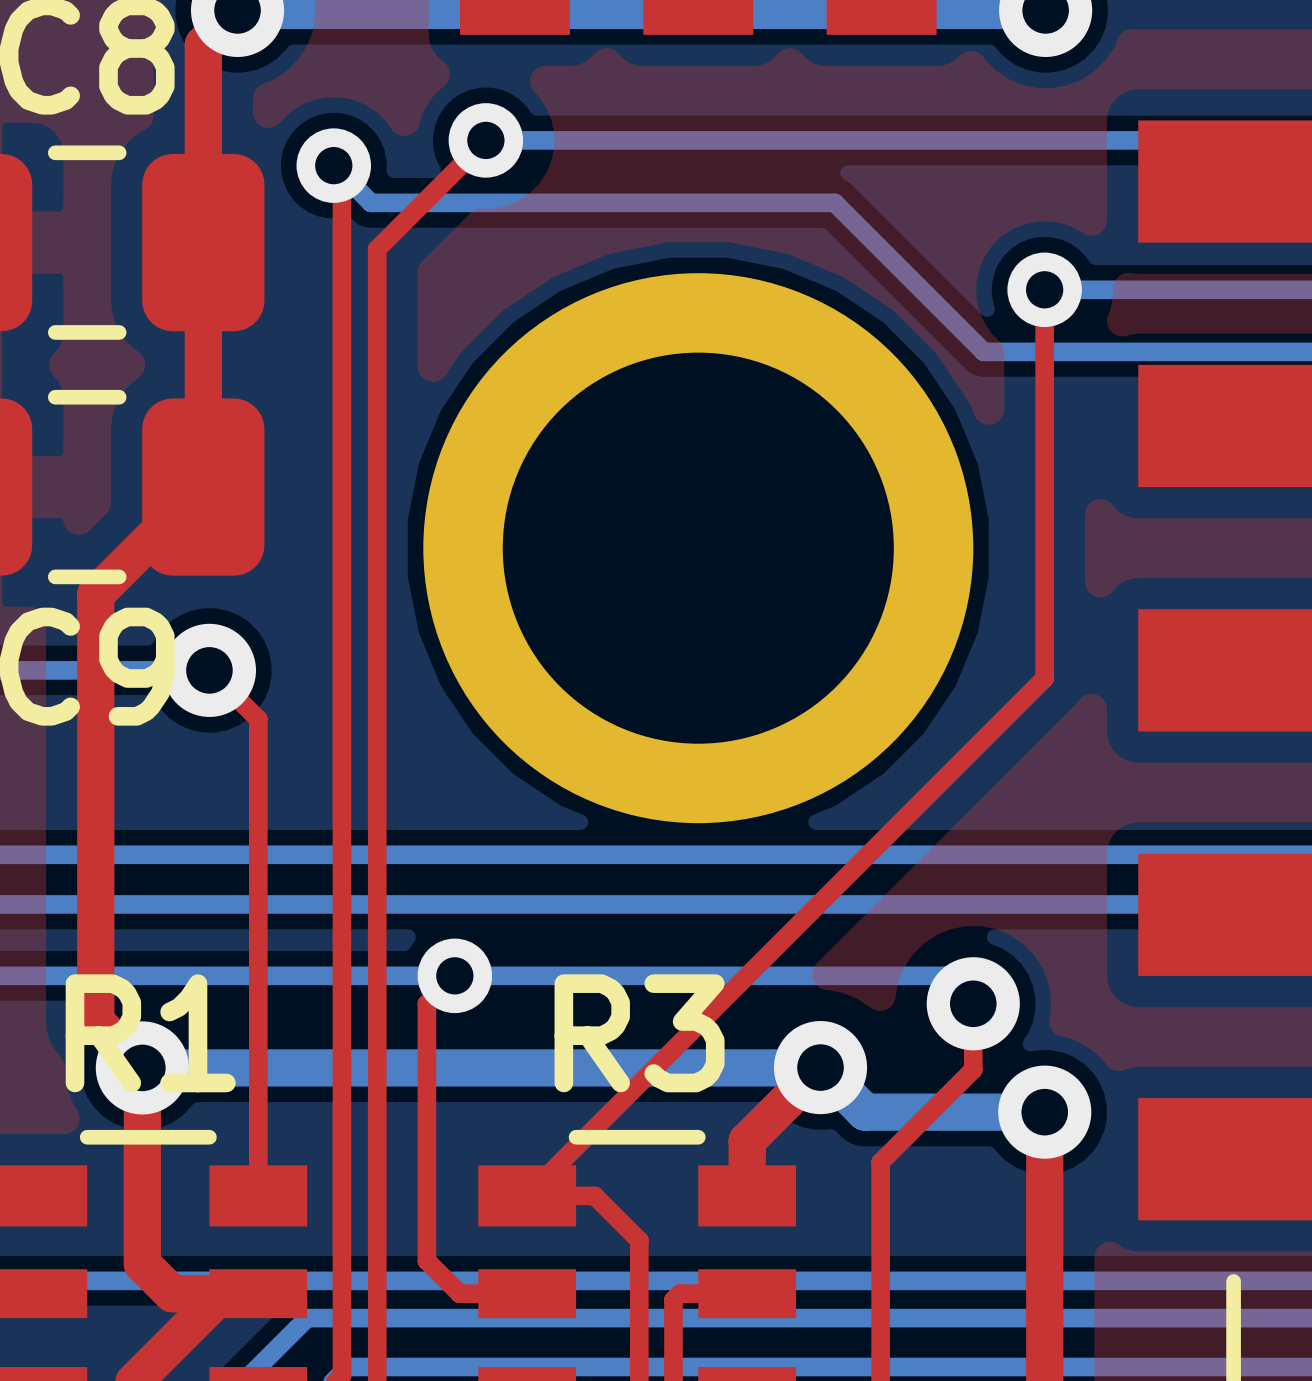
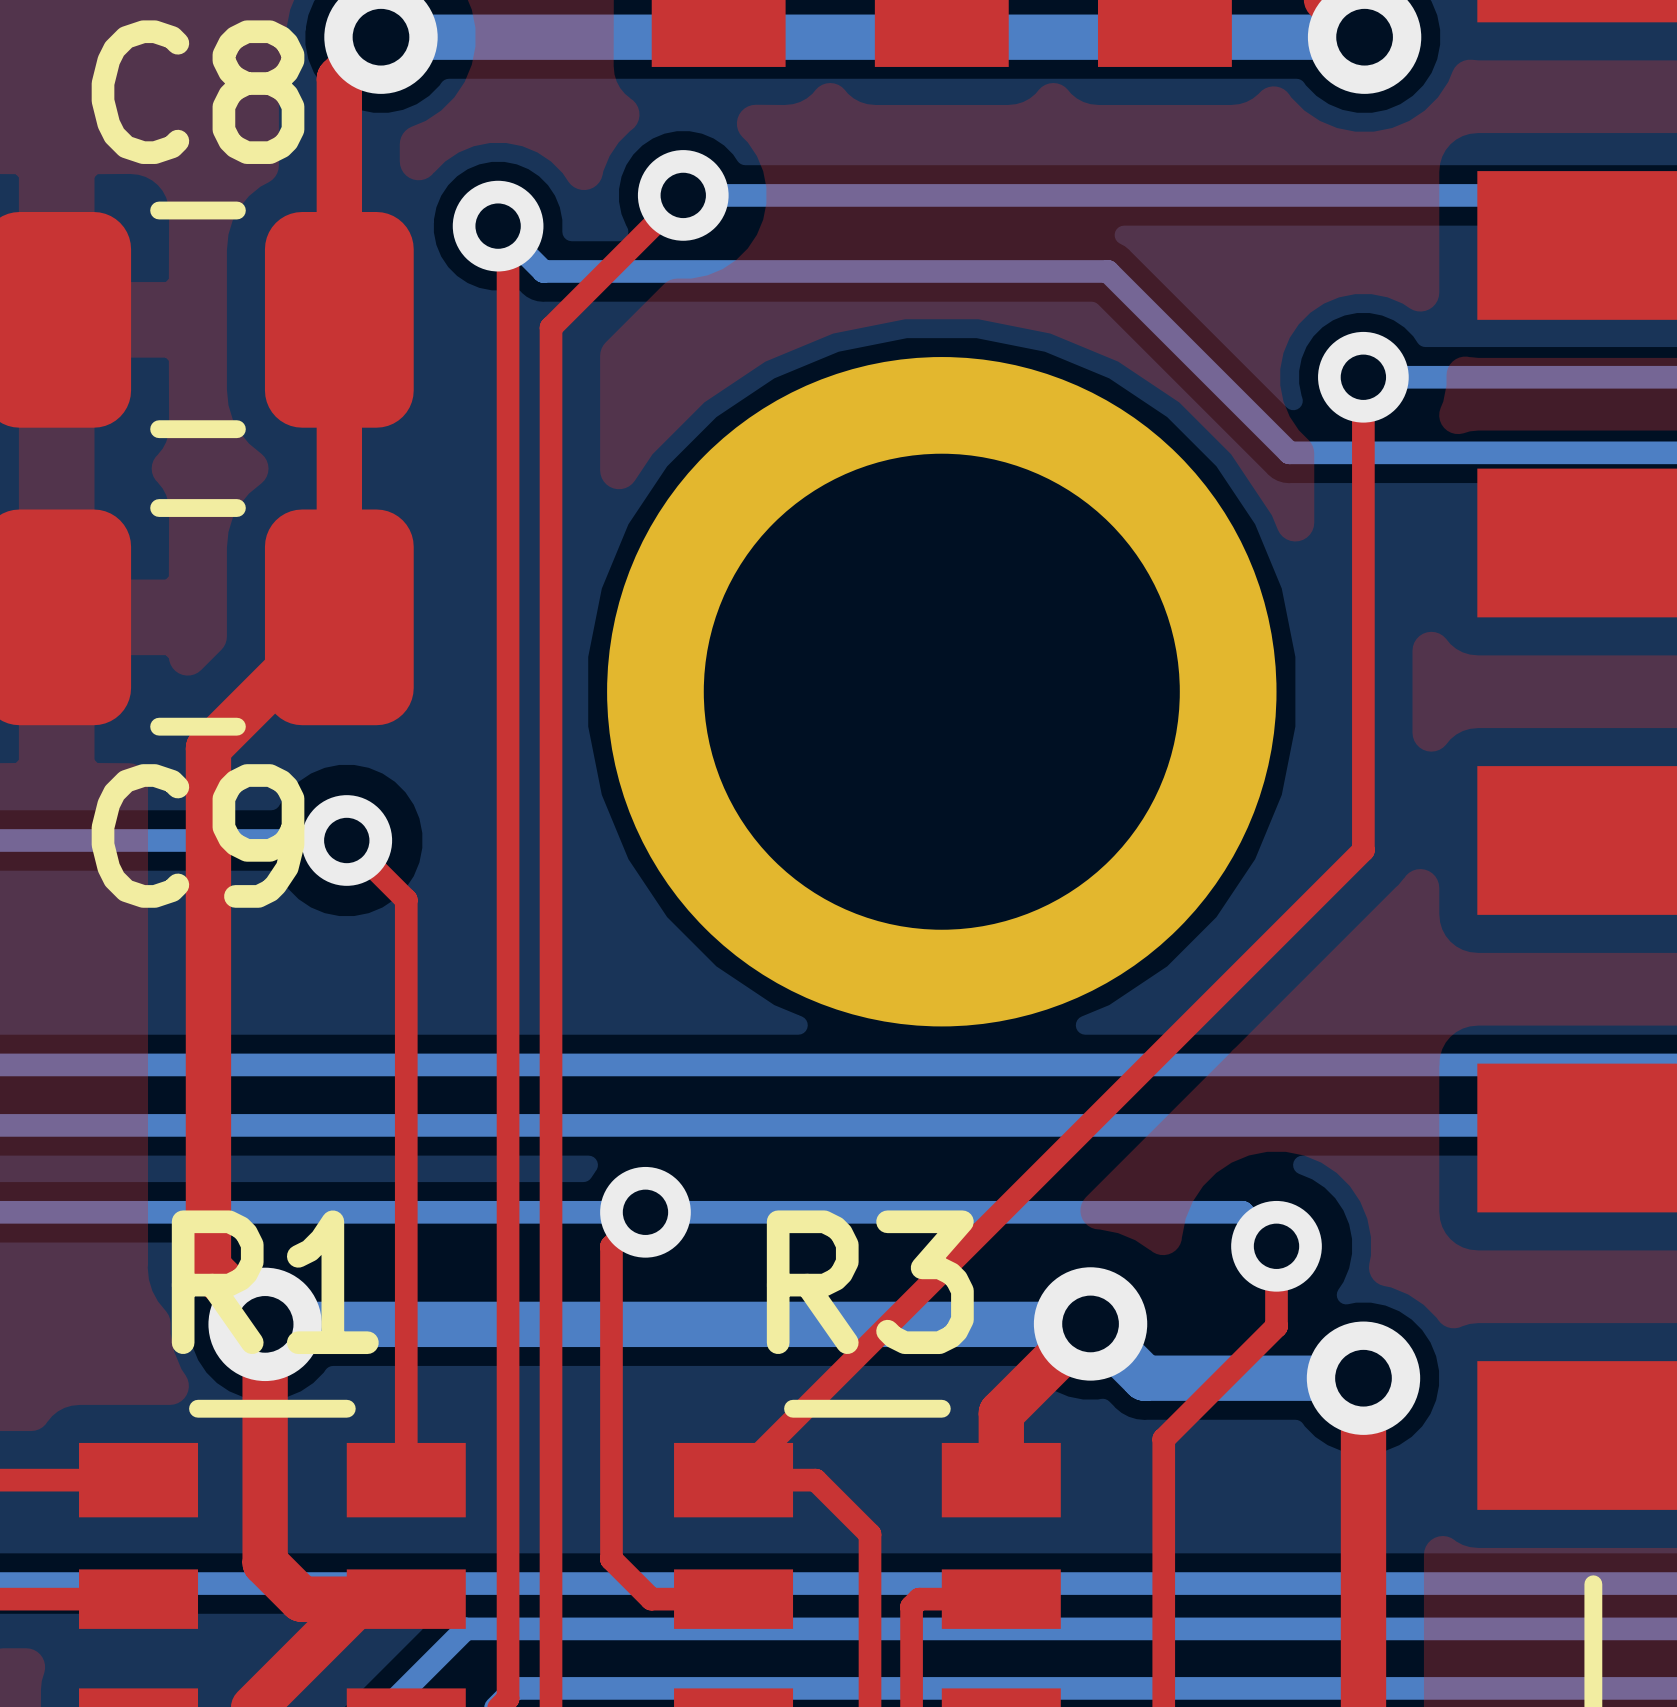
via size: [162, 623, 256, 717] -> [301, 795, 393, 886]
via size: [926, 957, 1020, 1051] -> [1231, 1200, 1322, 1292]

